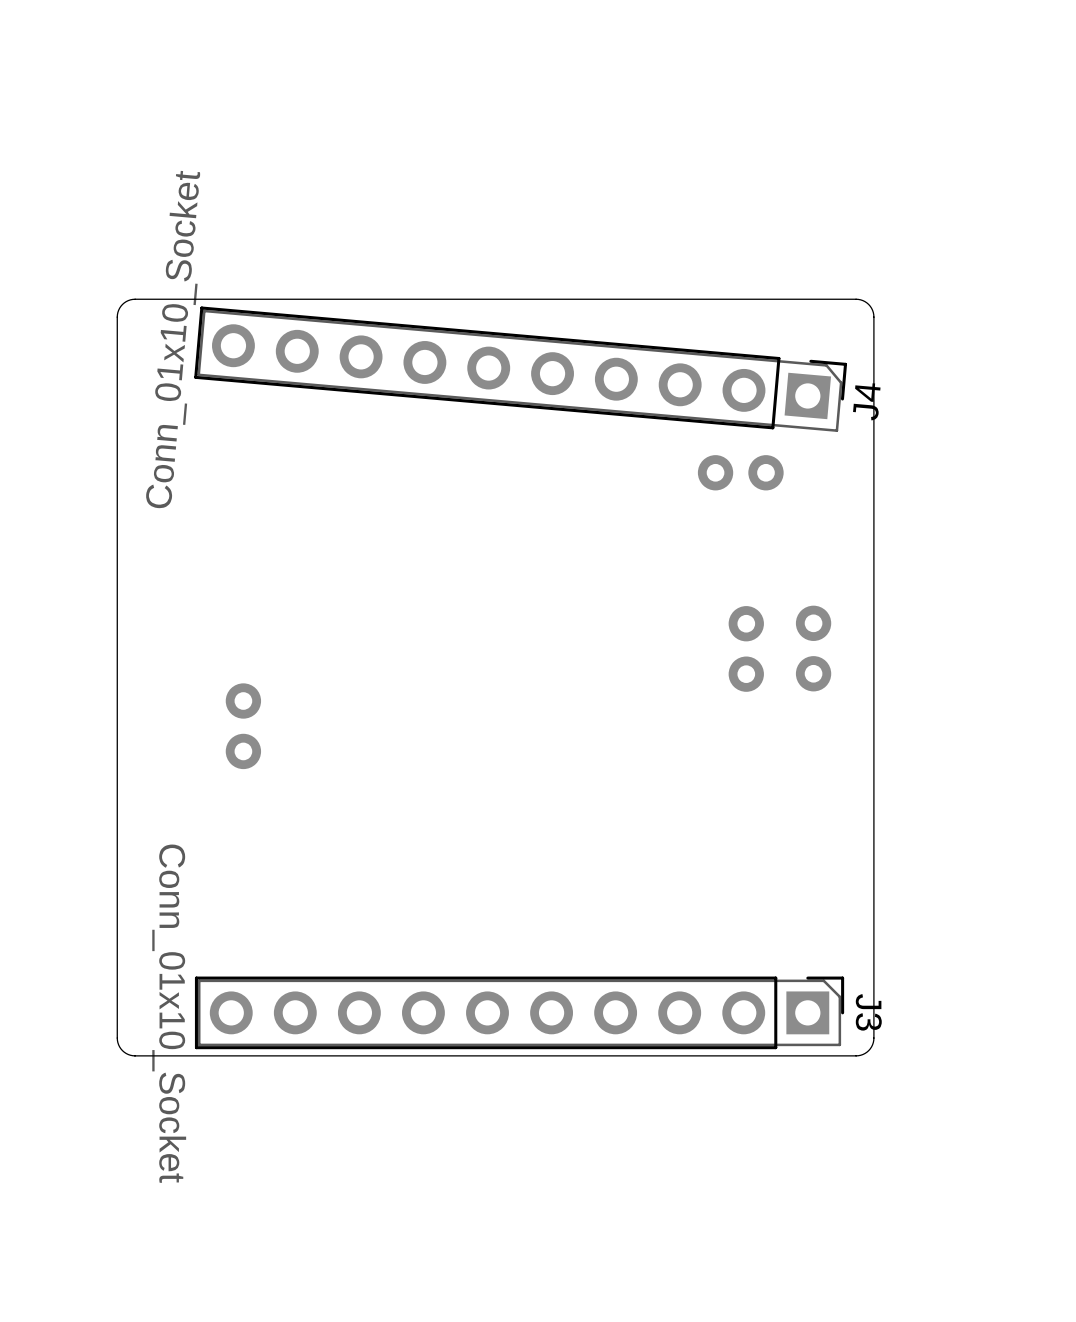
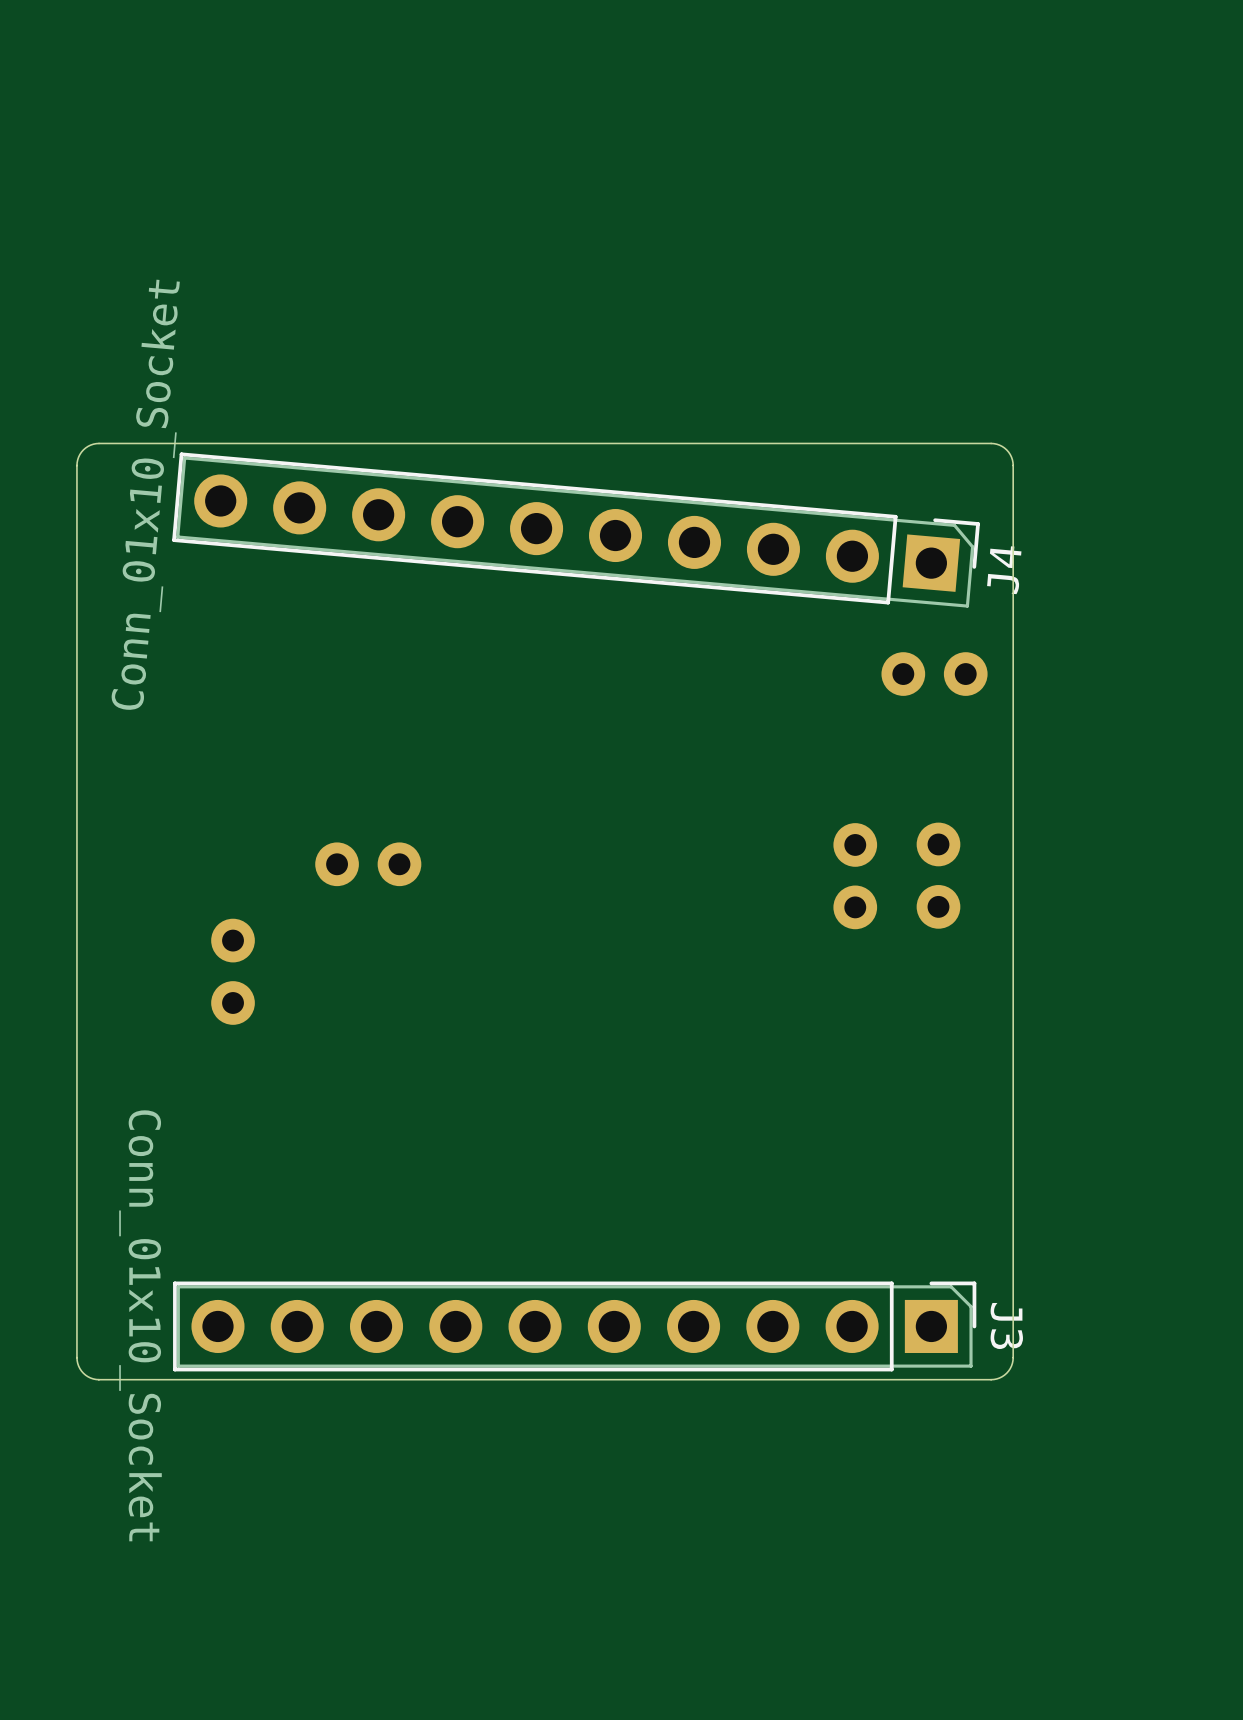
part position: (740, 472) -> (934, 674)
part: none -> (368, 864)

